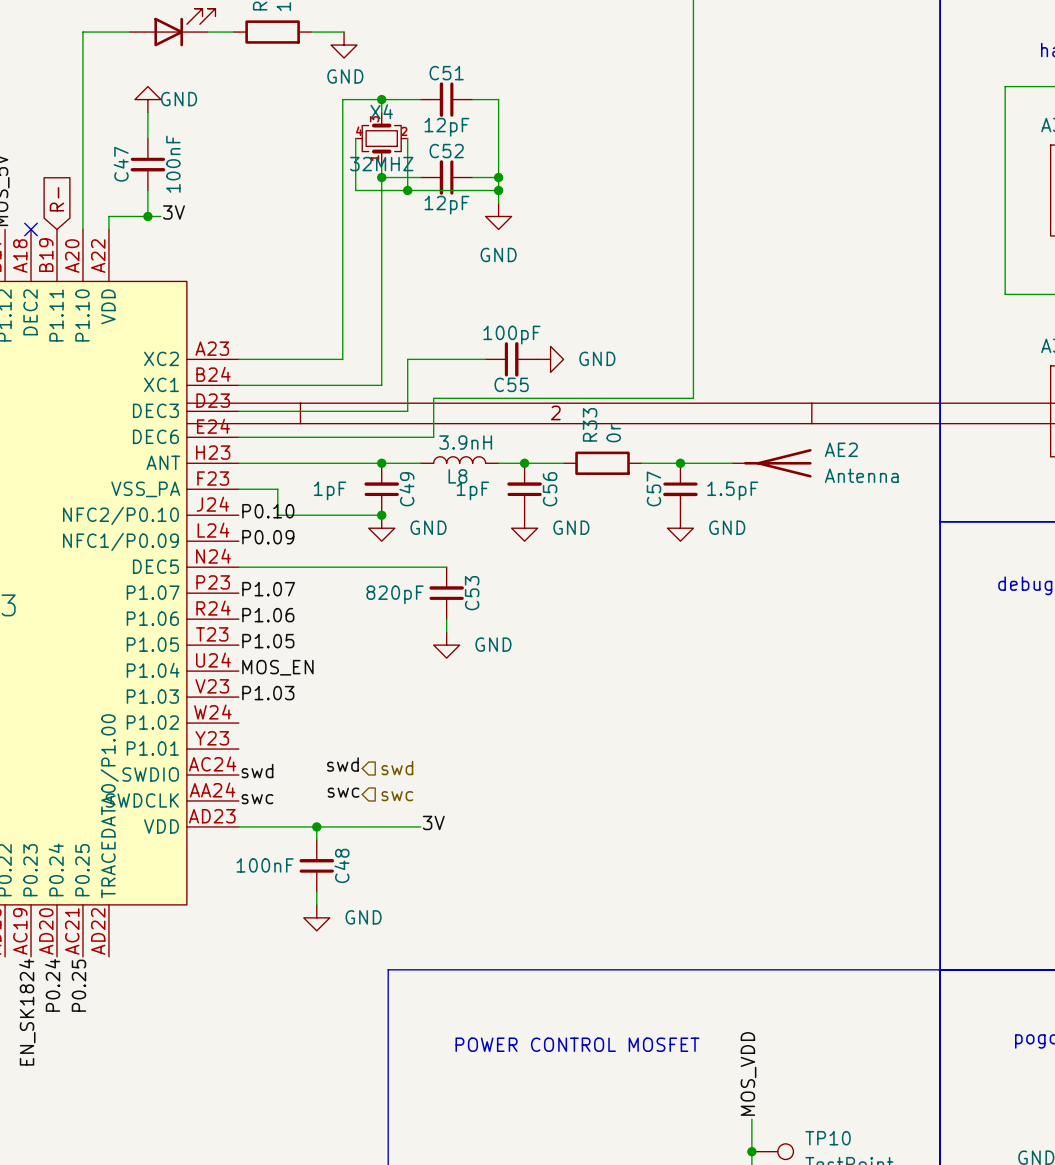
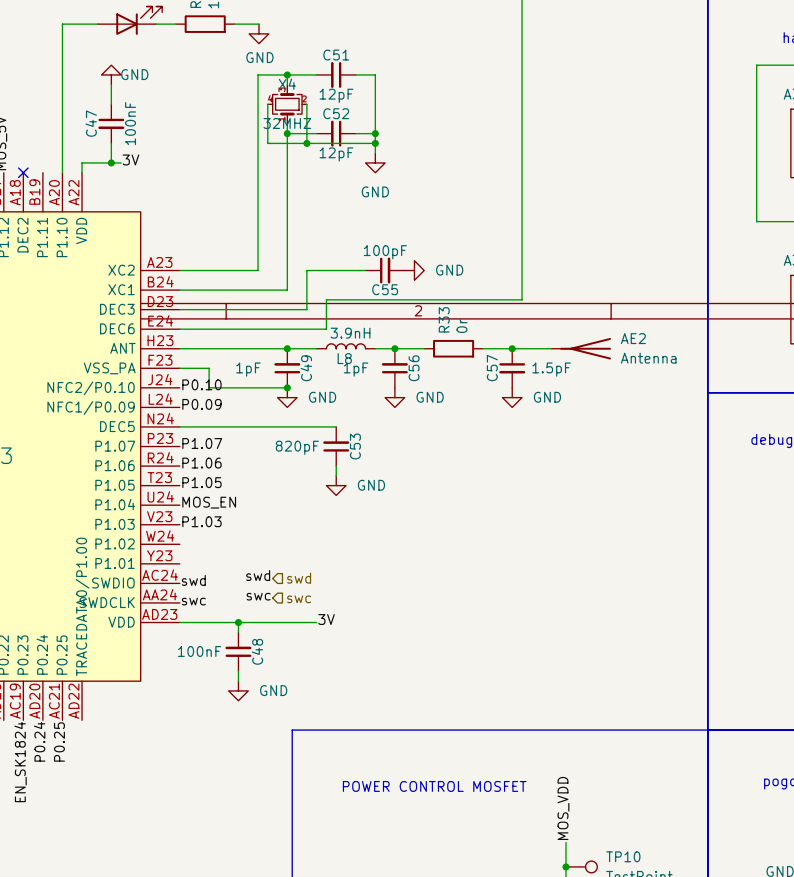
global label: R- (56, 199) -> none

